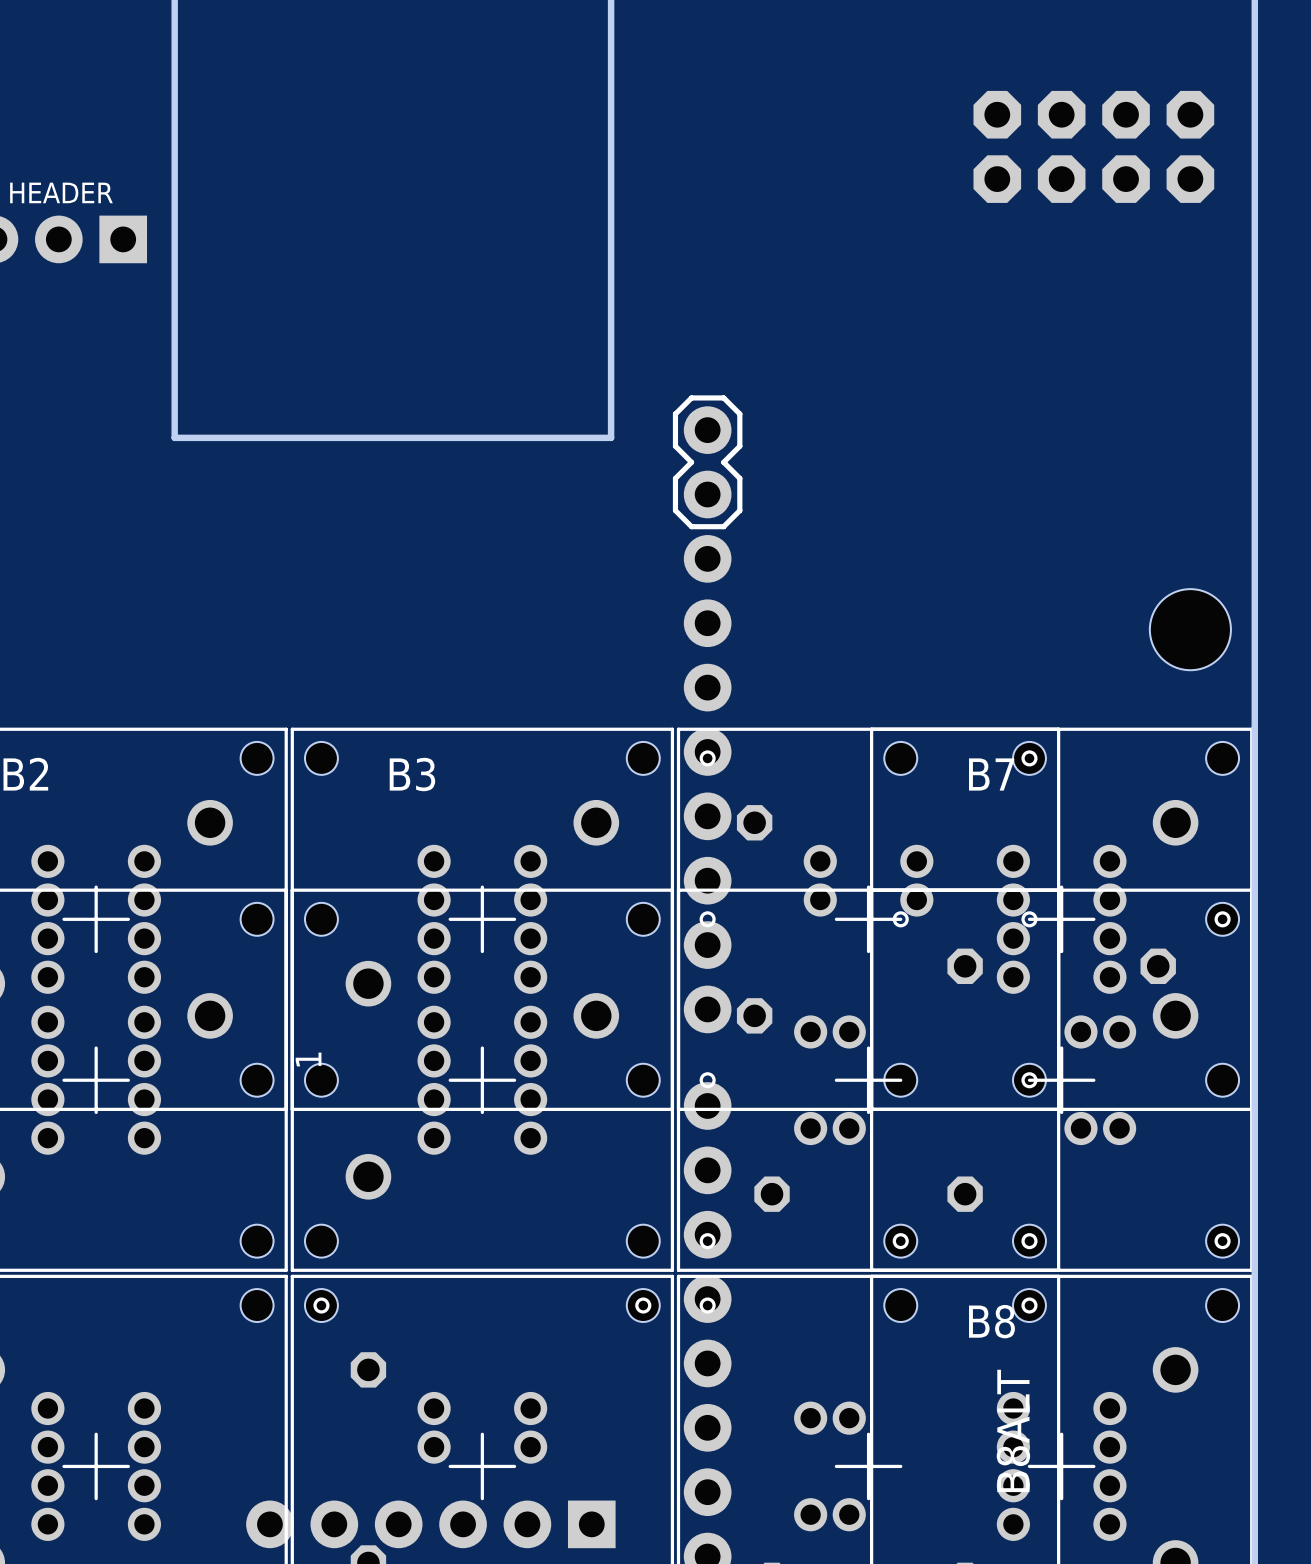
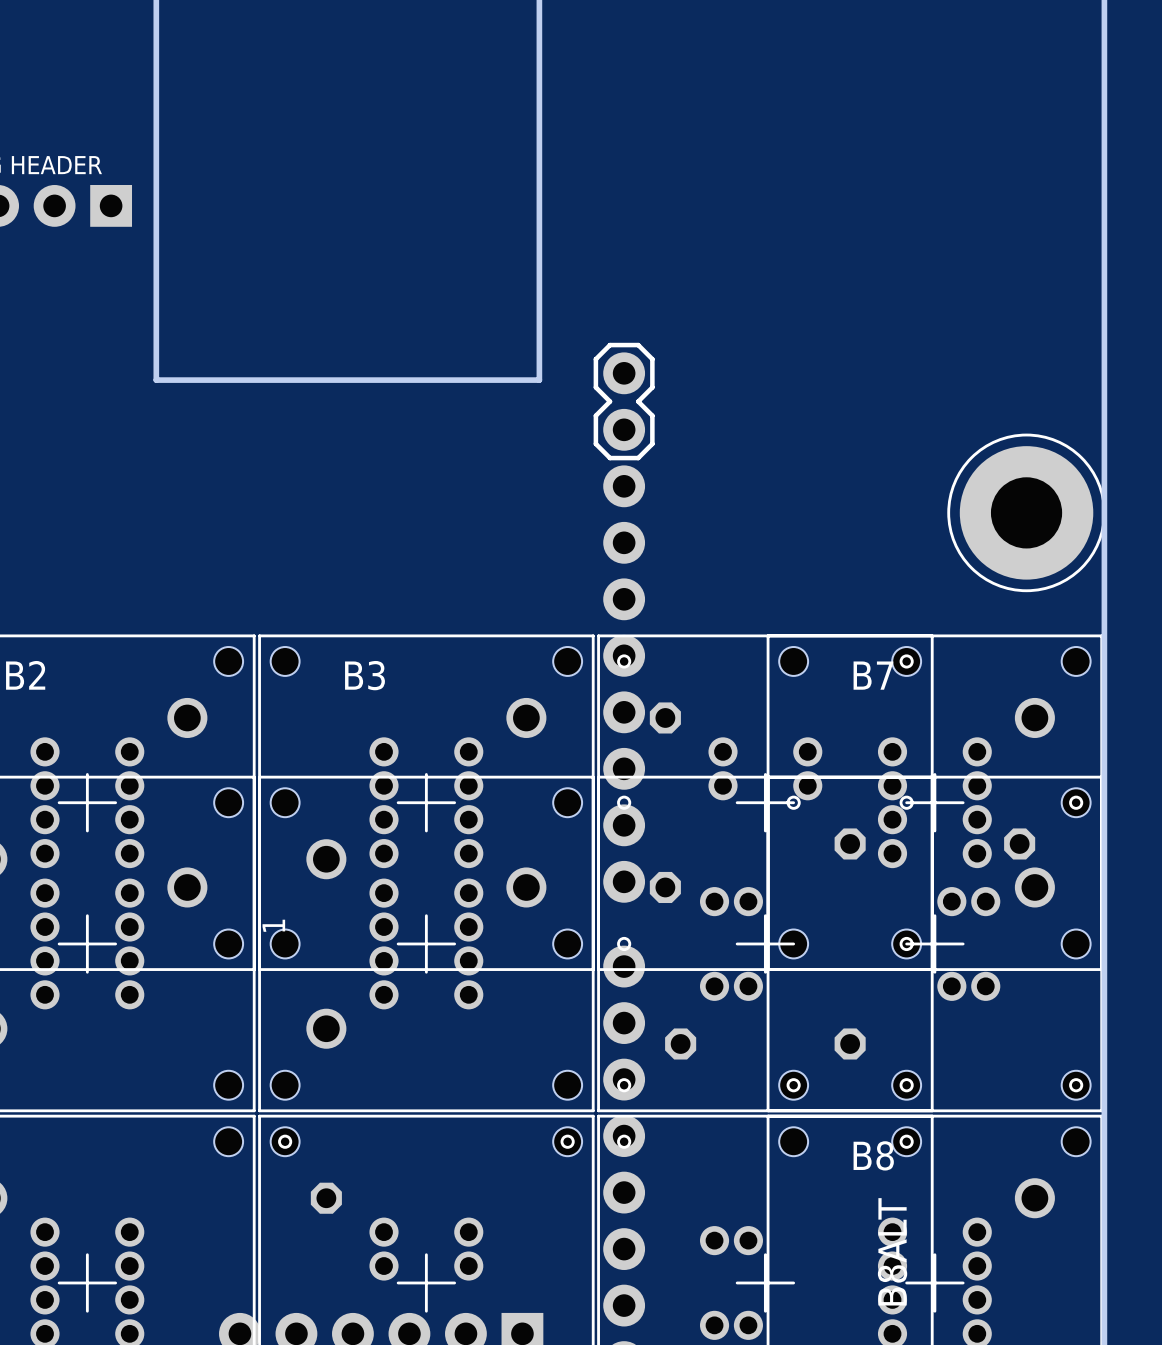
part: (1093, 146) -> none
part: none -> (1026, 512)
hole: (1190, 629) -> none

